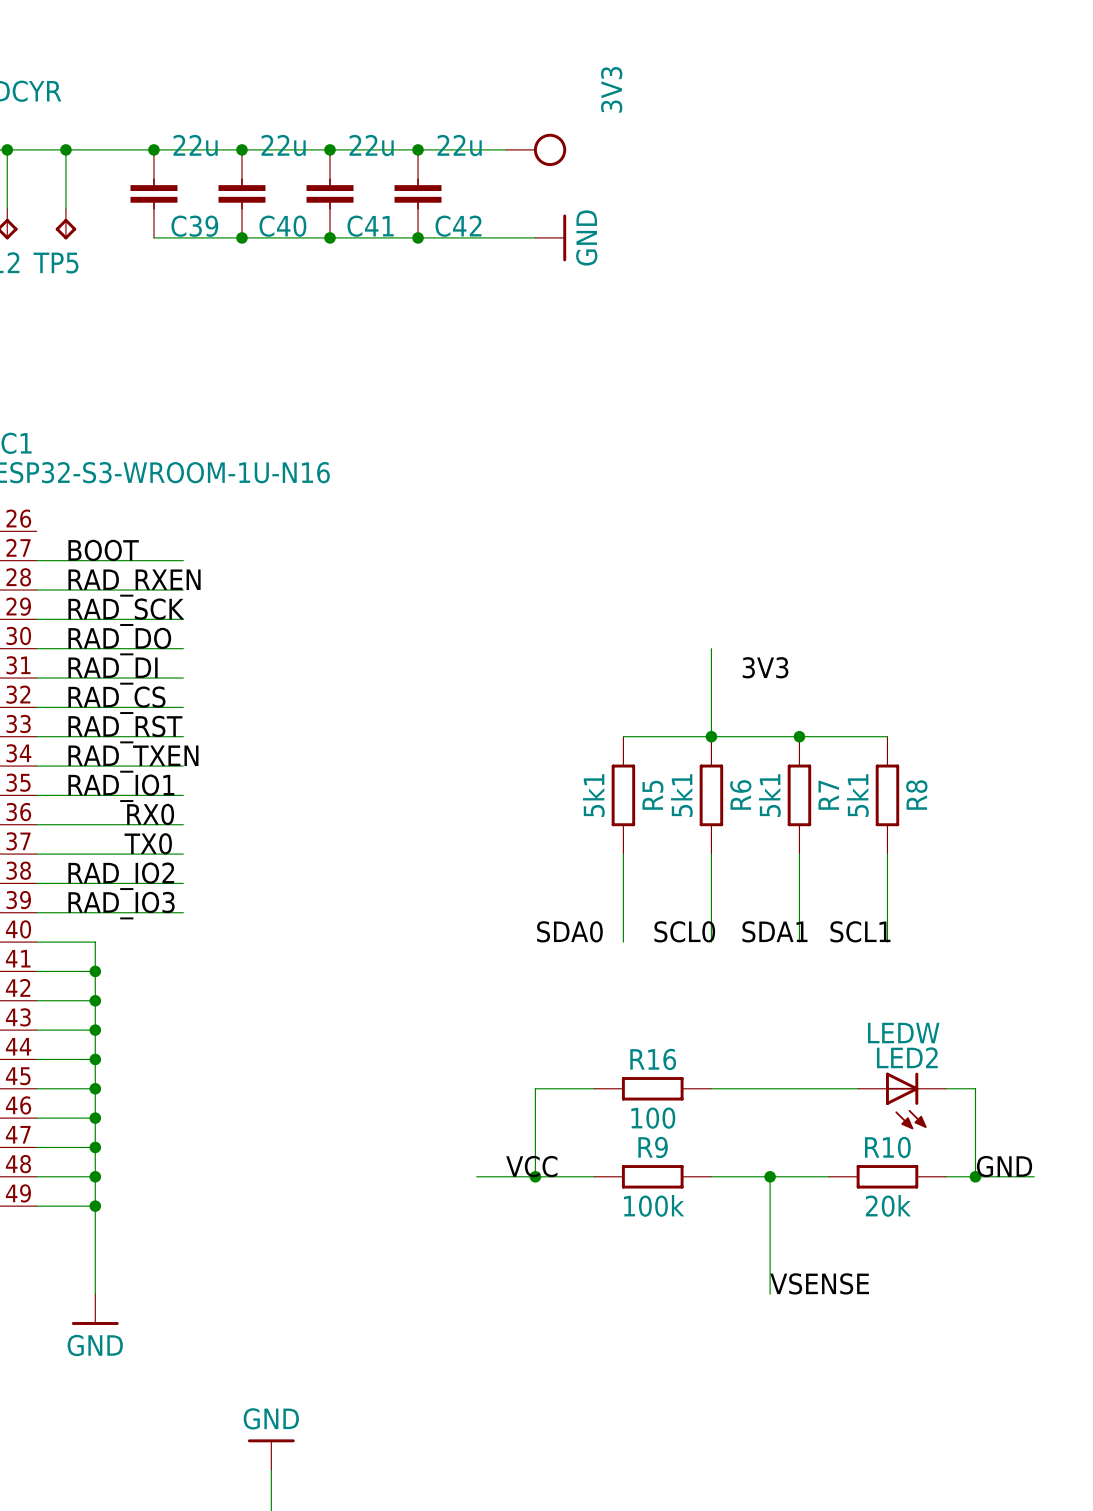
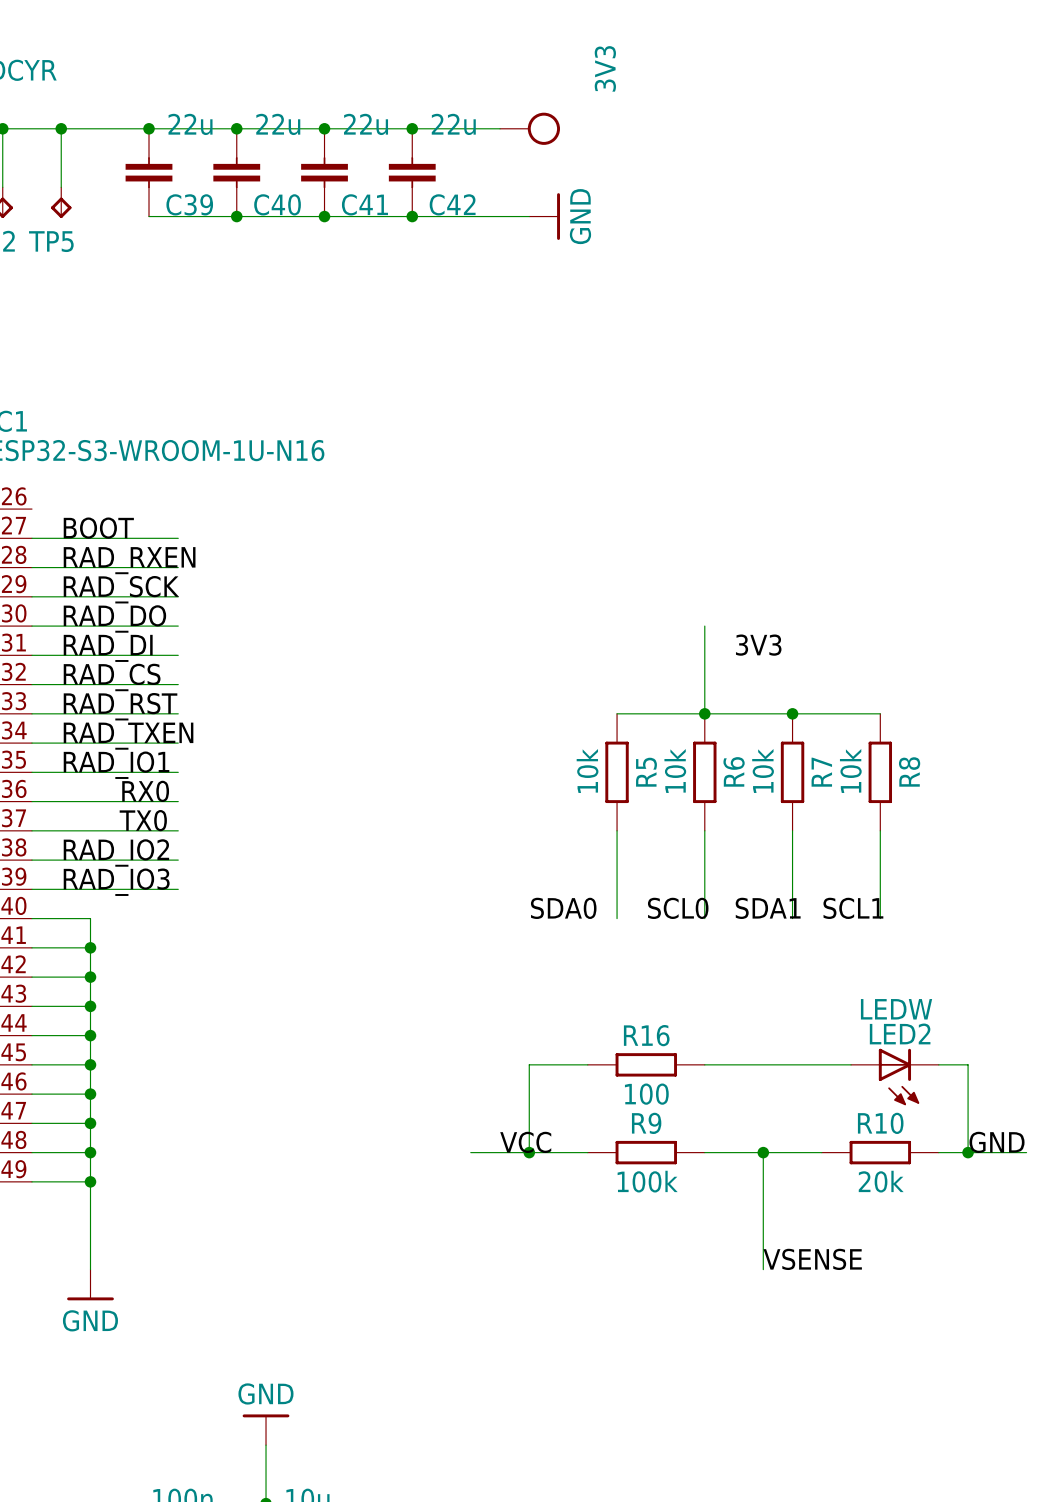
R5 value: 5k1 (593, 795) -> 10k (587, 770)
R6 value: 5k1 (681, 795) -> 10k (675, 770)
R7 value: 5k1 (769, 795) -> 10k (763, 770)
R8 value: 5k1 (857, 795) -> 10k (850, 770)

